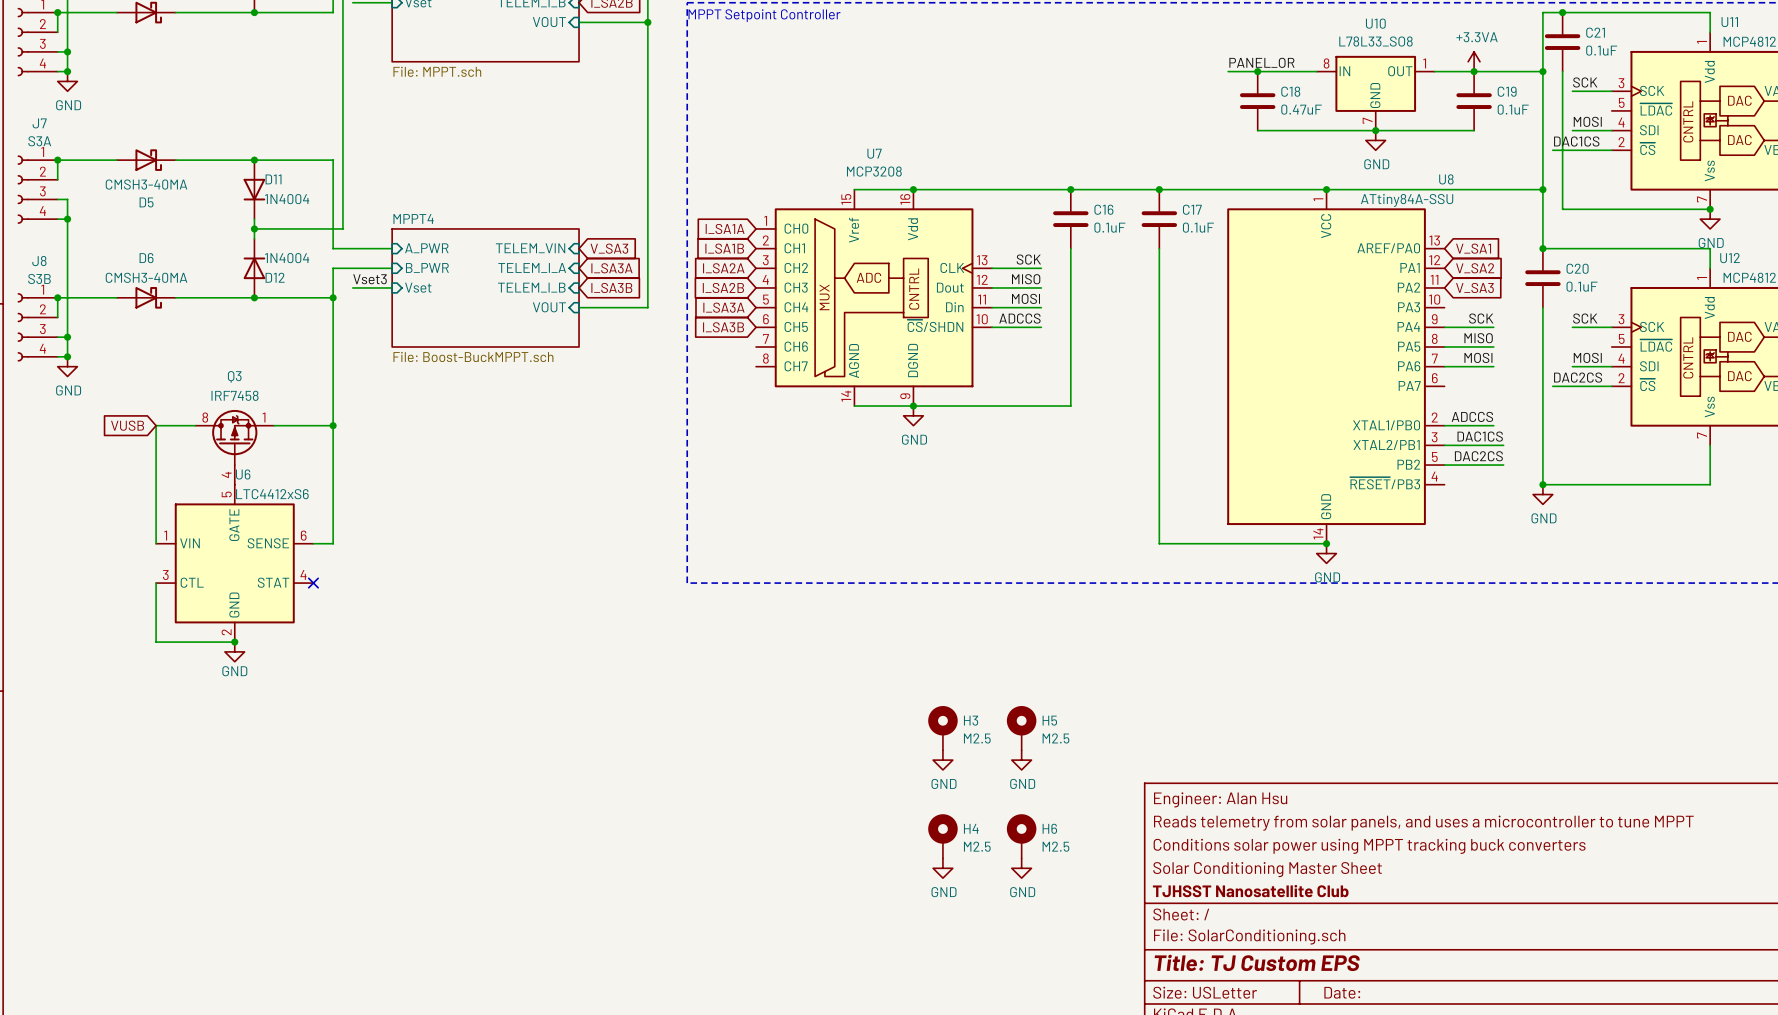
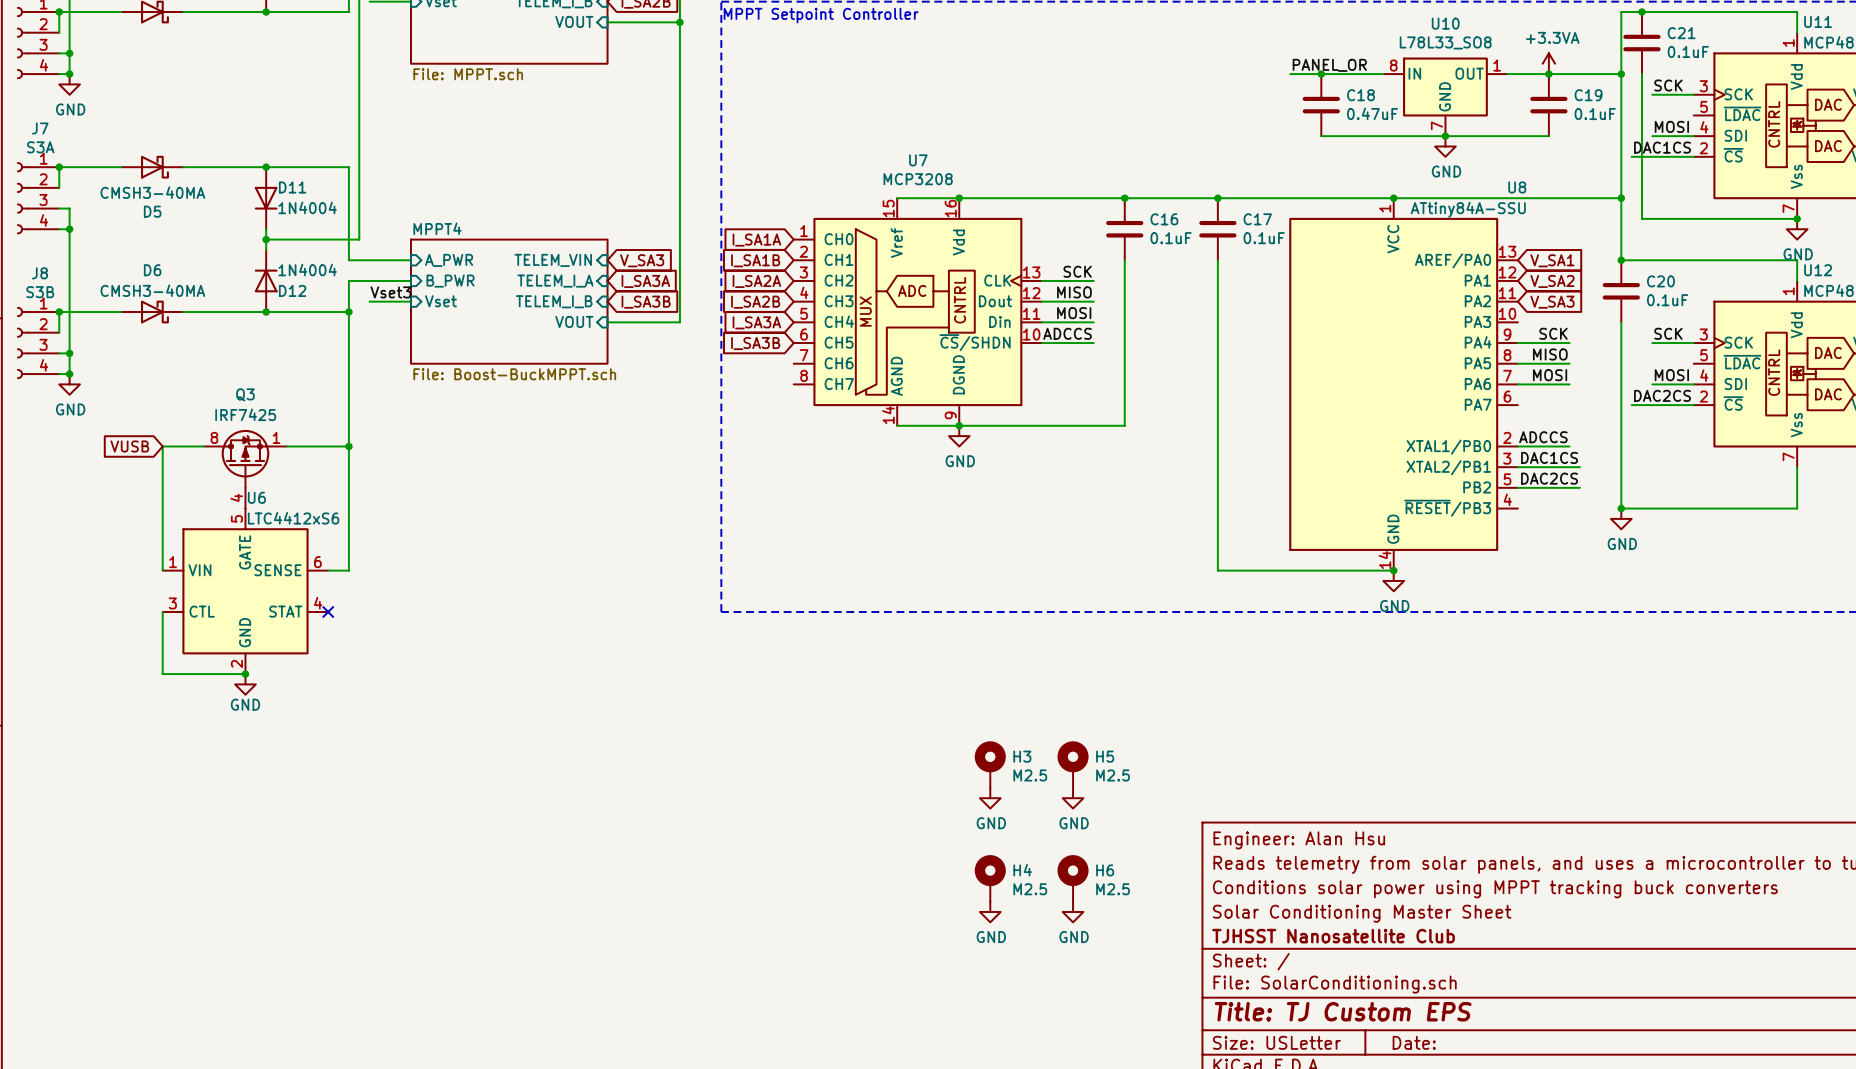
Q3 value: IRF7458 (235, 395) -> IRF7425 (245, 414)

